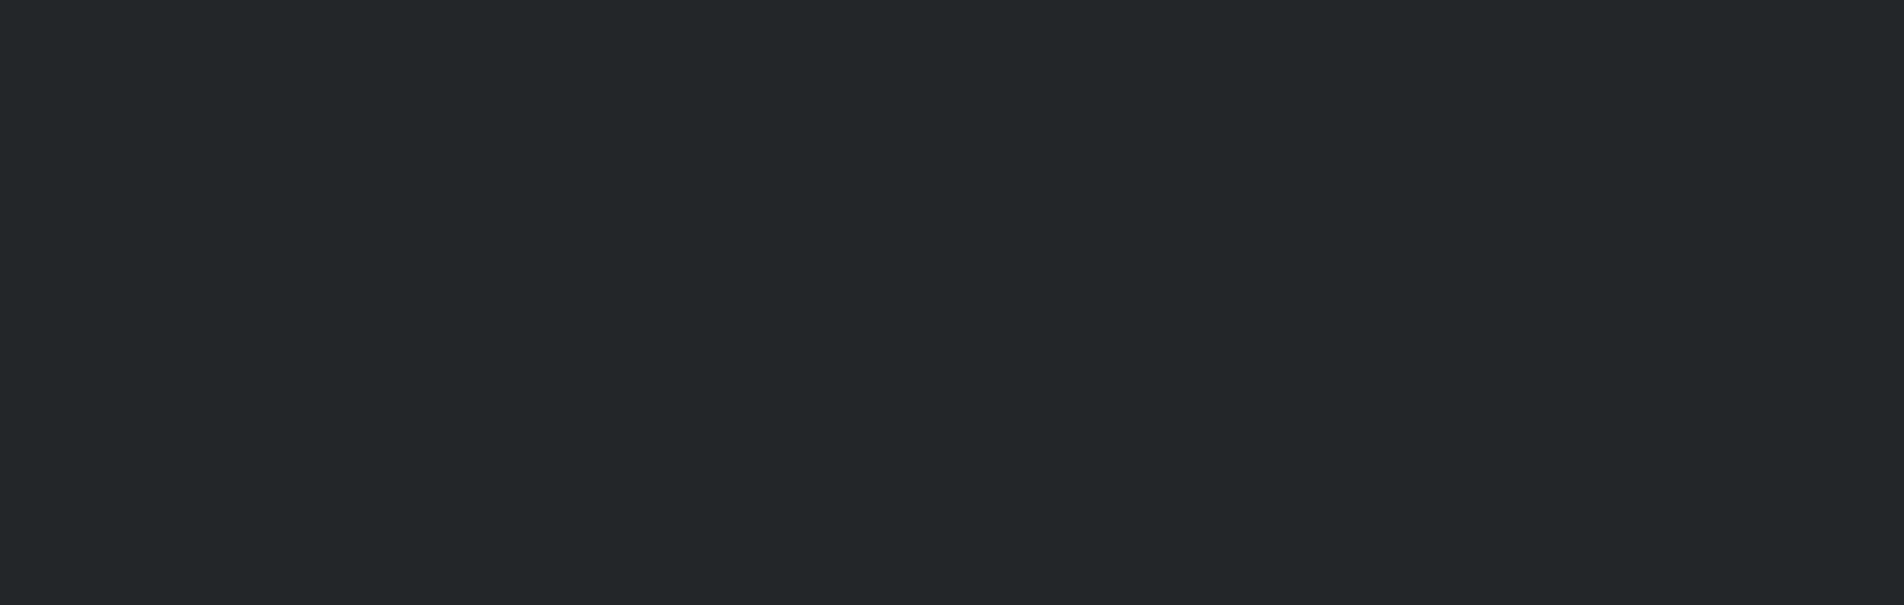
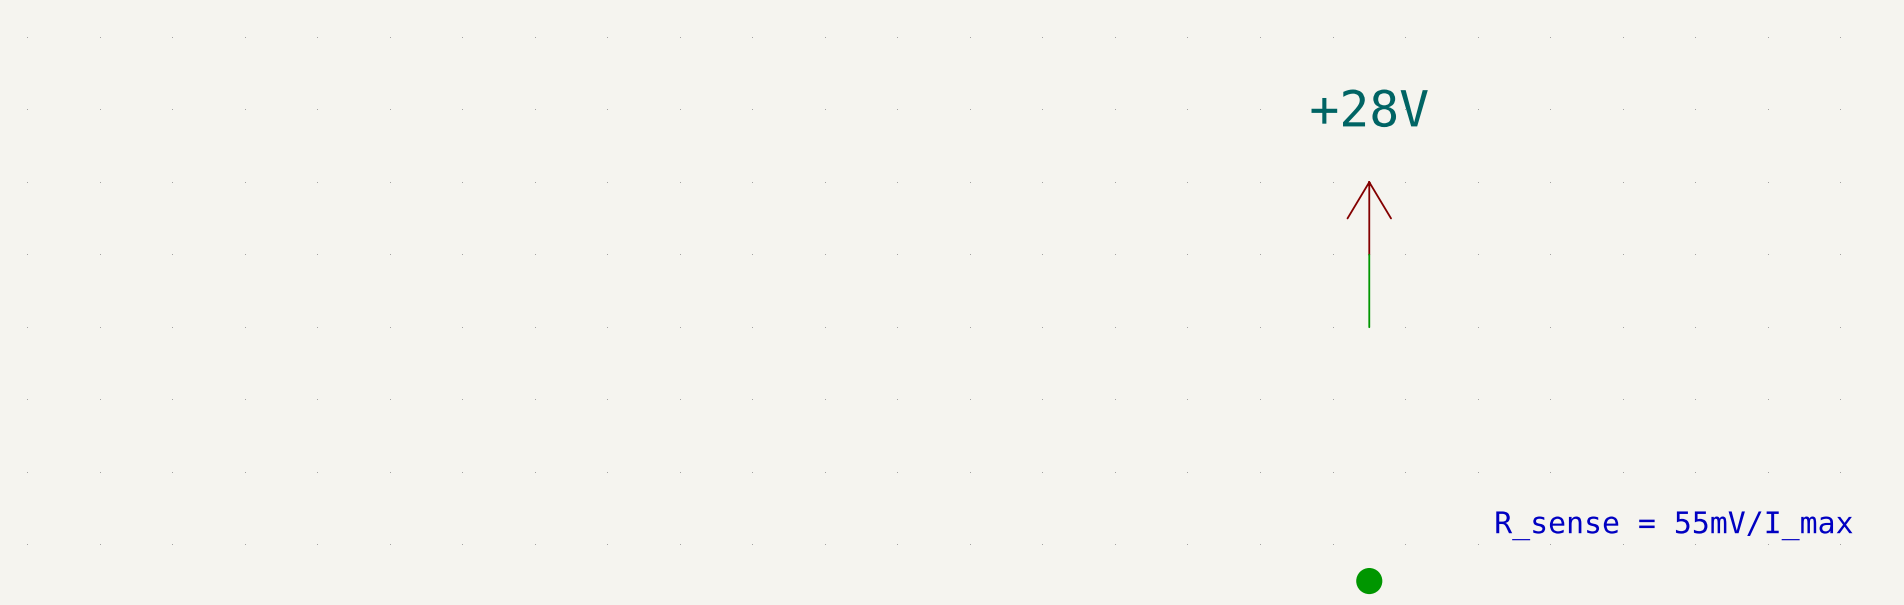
power symbol: none -> +28V (1369, 218)
wire: none -> (1369, 254) (1369, 327)
text: none -> R_sense = 55mV/I_max (1674, 525)
junction: none -> (1369, 581)

